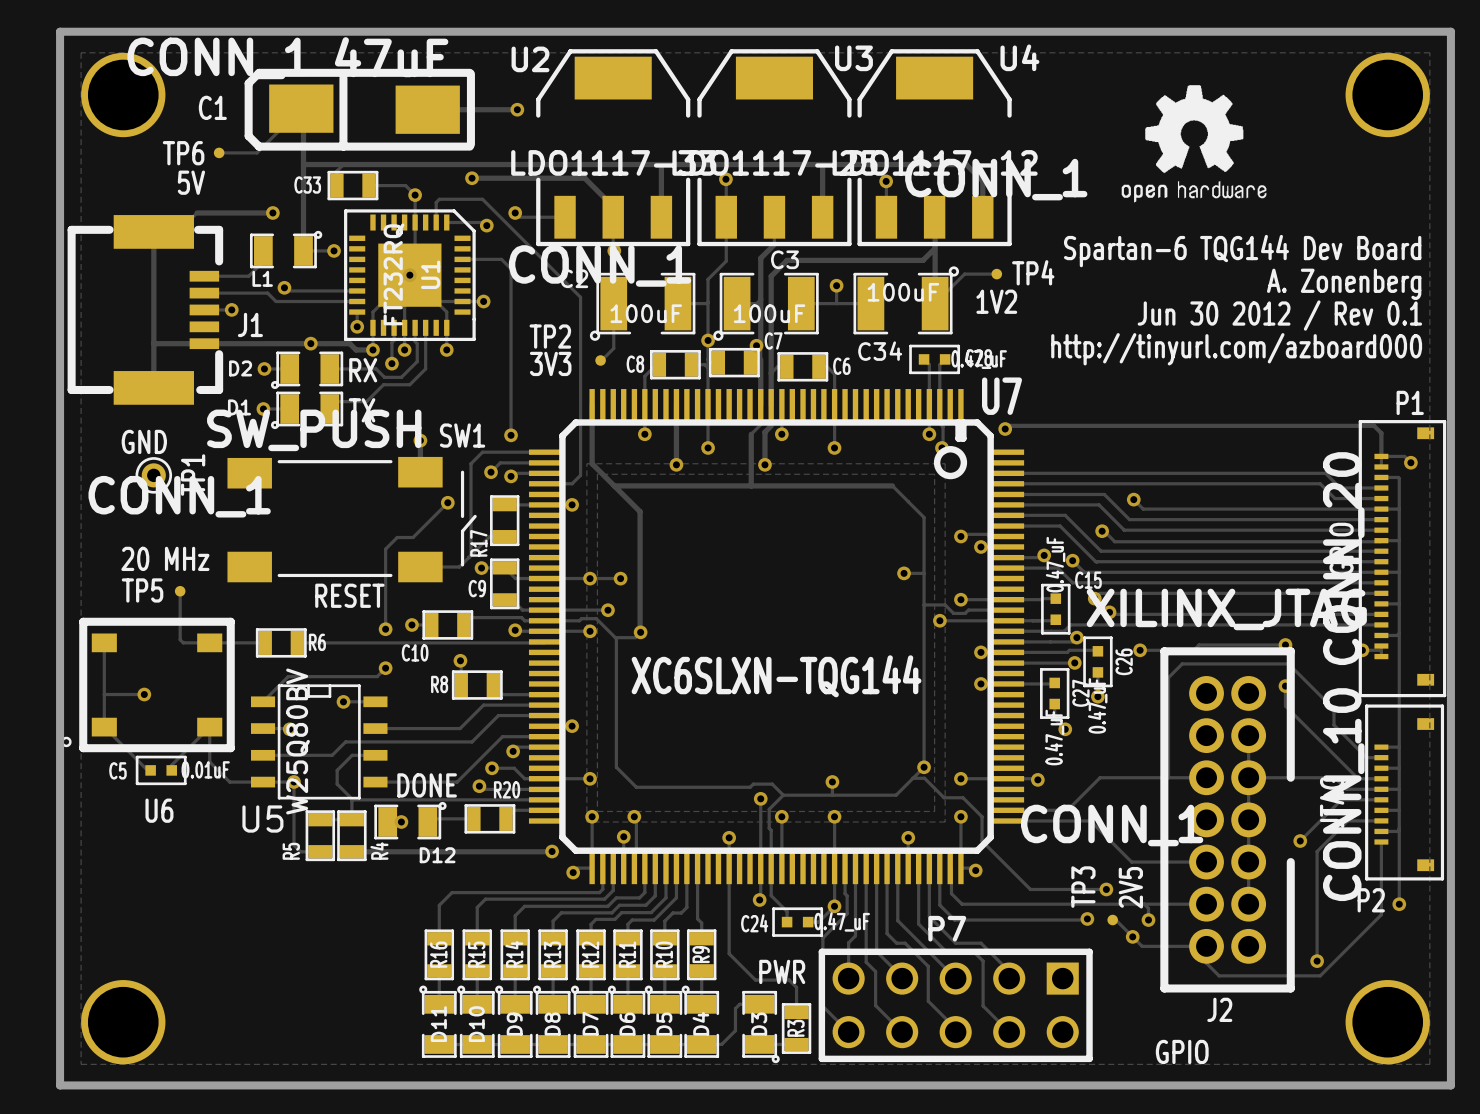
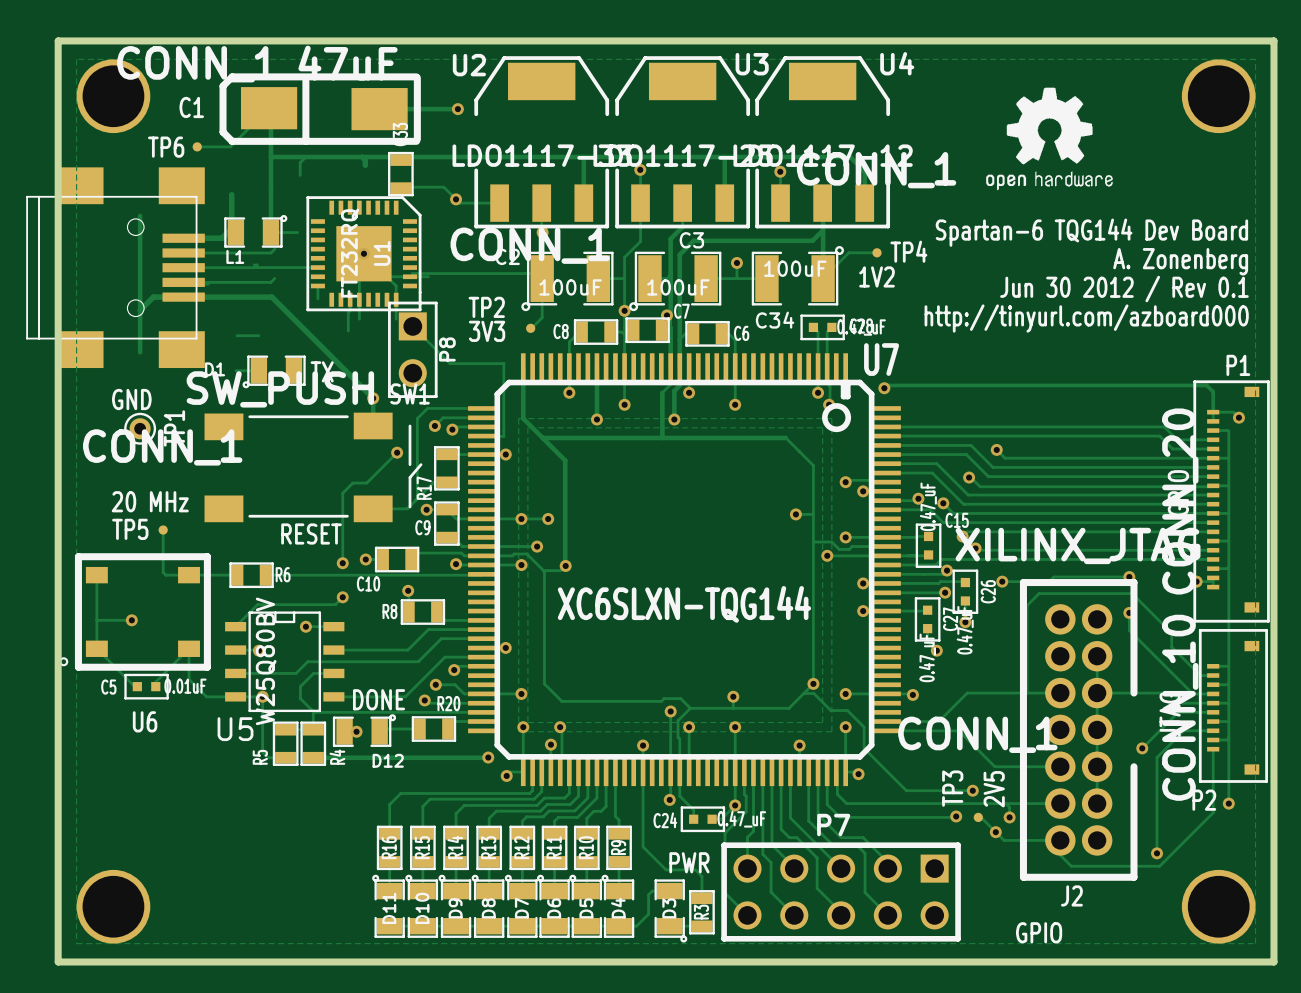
track: none -> (362, 157) (365, 160) (365, 165)
track: (472, 178) (584, 178) (613, 206) (613, 217) -> none
via: (472, 178) -> none
text: 5V (191, 182) -> none
C33 rotation: 0° (352, 185) -> 90° clockwise (400, 174)
C33 position: (352, 185) -> (400, 174)
track: (369, 185) (405, 185) (415, 195) (415, 269) (372, 312) (372, 349) (356, 349) (349, 343) (153, 343) -> none
via: (415, 195) -> none
track: none -> (400, 188) (443, 187) (456, 199)
track: none -> (231, 194) (231, 228) (221, 238) (183, 238)
track: (272, 212) (197, 212) (178, 231) (153, 231) -> none
via: (272, 212) -> none
track: (436, 222) (436, 202) (439, 199) (482, 199) (580, 297) (580, 475) (572, 483) (545, 483) -> (412, 326) (450, 363) (503, 363) (503, 436) (482, 436)
track: (446, 222) (483, 222) (486, 225) -> none
via: (486, 225) -> none
track: (263, 250) (263, 261) (248, 276) (204, 276) -> none
via: (334, 250) -> none
track: (462, 259) (501, 259) (511, 268) (511, 435) -> none
track: none -> (274, 249) (270, 252) (183, 252)
via: (284, 287) -> none
track: none -> (257, 264) (254, 267) (183, 267)
part: none -> (115, 267)
track: (204, 293) (267, 293) (276, 301) (357, 301) -> none
track: none -> (412, 273) (537, 273) (542, 278)
via: (483, 301) -> none
track: none -> (274, 278) (270, 282) (183, 282)
J1: (145, 309) -> none
via: (231, 309) -> none
via: (357, 326) -> none
track: (415, 327) (417, 361) (401, 377) (384, 377) (376, 368) (329, 368) -> none
track: (425, 327) (425, 368) (409, 384) (383, 384) (366, 401) (337, 401) (329, 408) -> none
track: none -> (140, 310) (153, 297) (271, 297) (373, 398)
via: (310, 343) -> none
via: (372, 349) -> none
via: (404, 349) -> none
via: (446, 349) -> none
via: (391, 363) -> none
via: (264, 368) -> none
D2: (307, 370) -> none
text: RX (363, 370) -> none
P8: none -> (412, 349)
via: (263, 408) -> none
via: (511, 435) -> none

